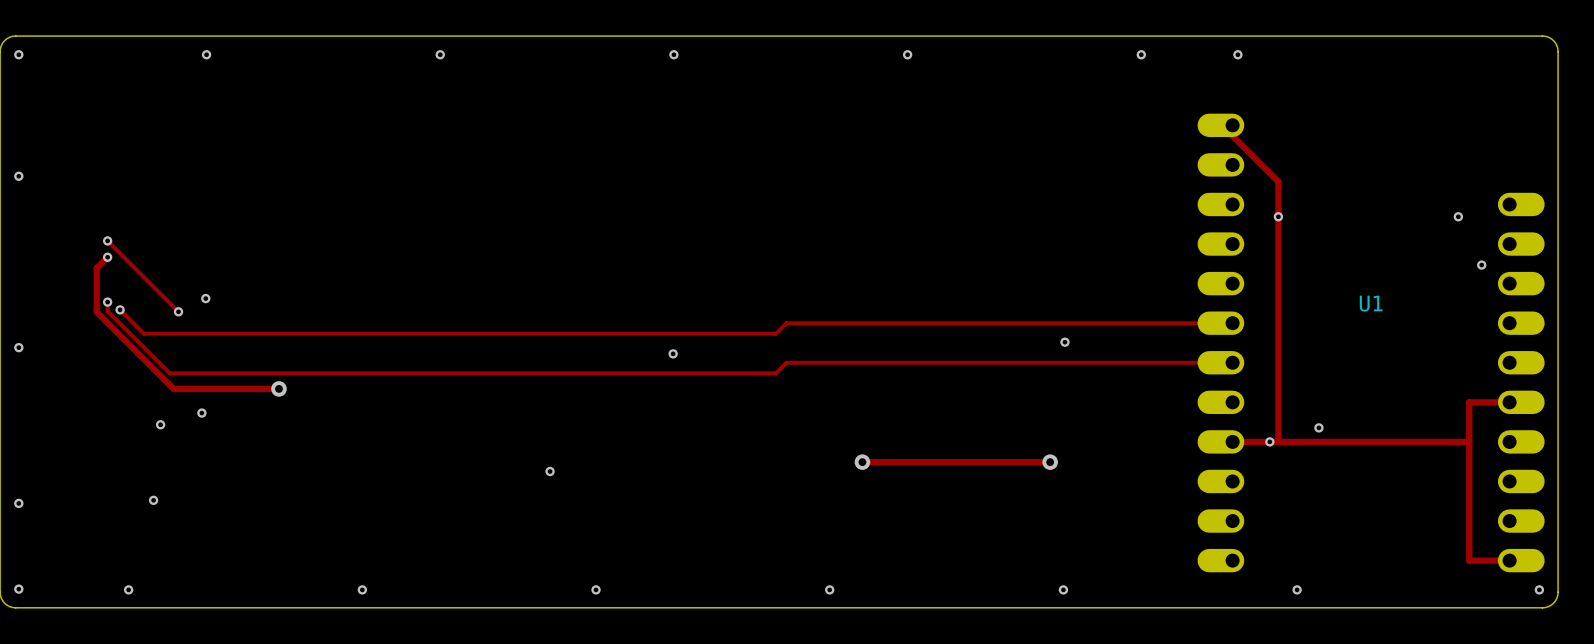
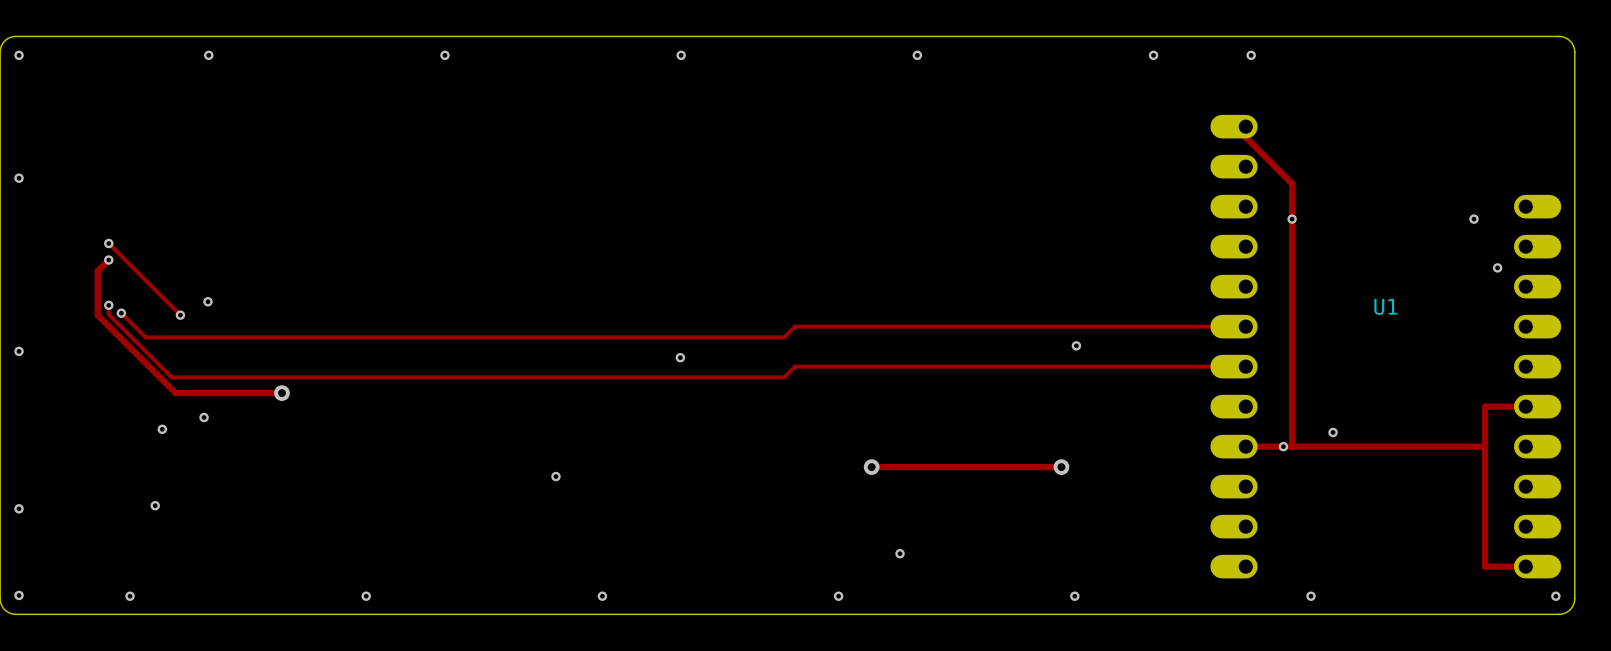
via: none -> (900, 553)

